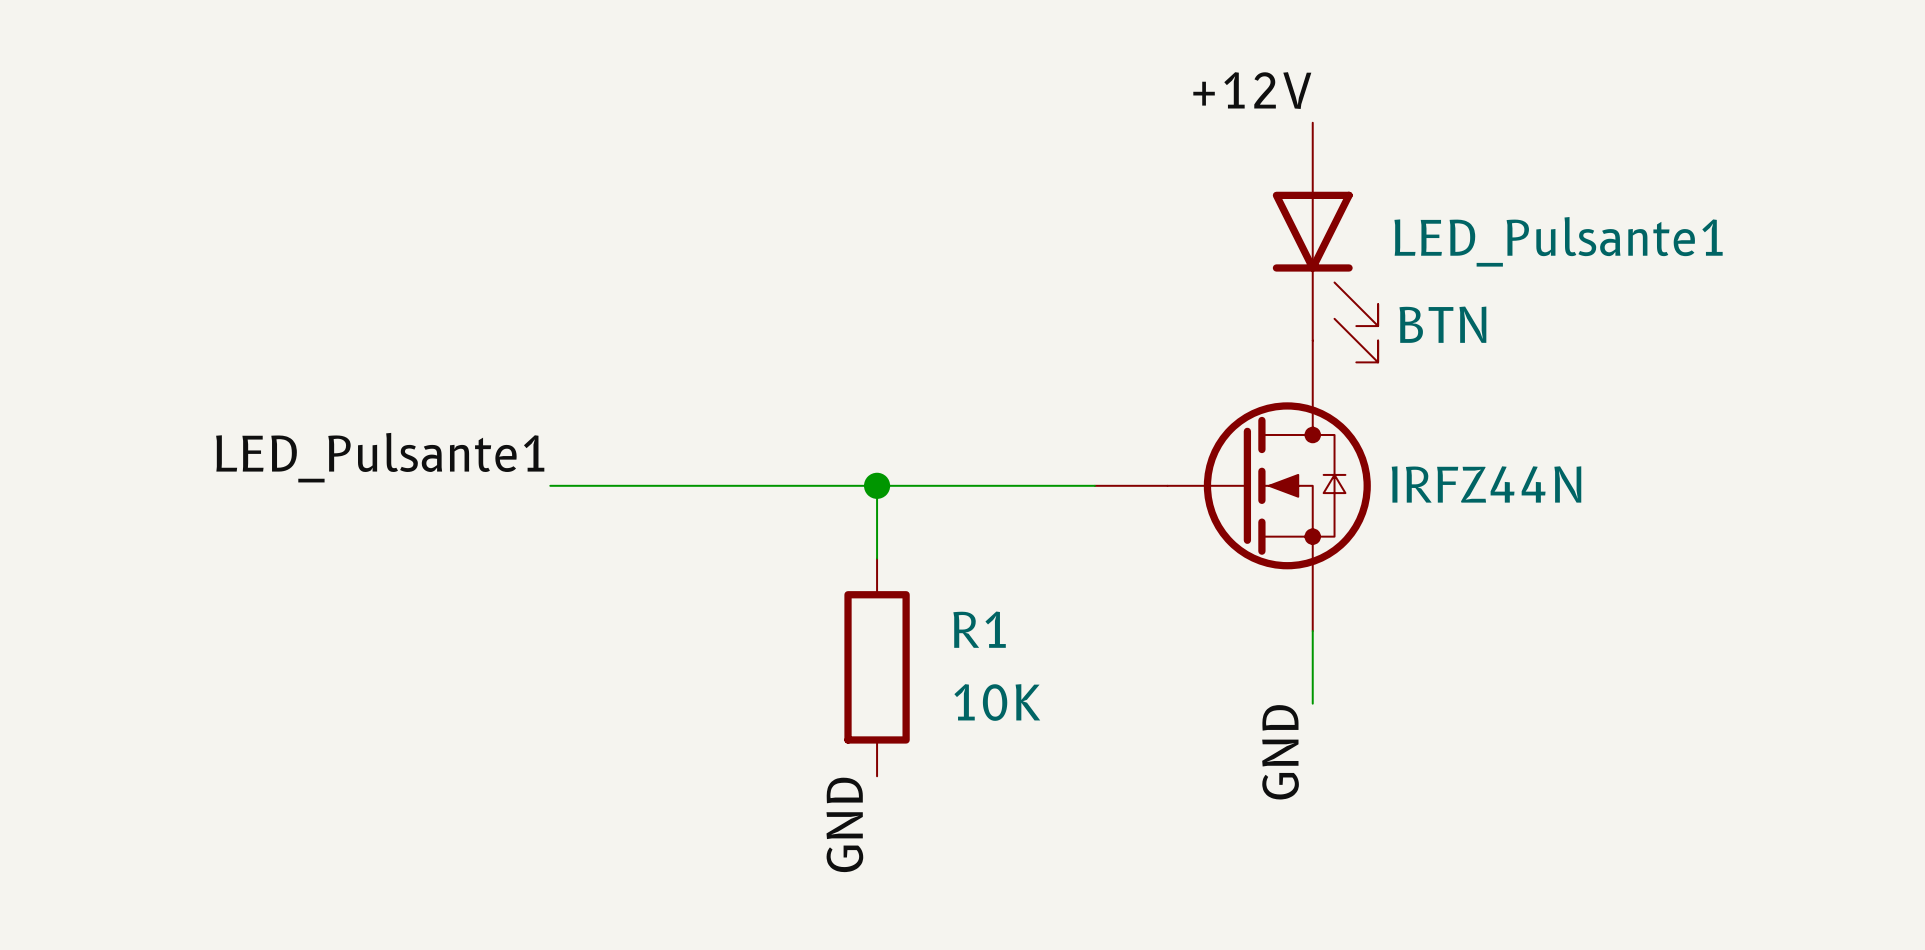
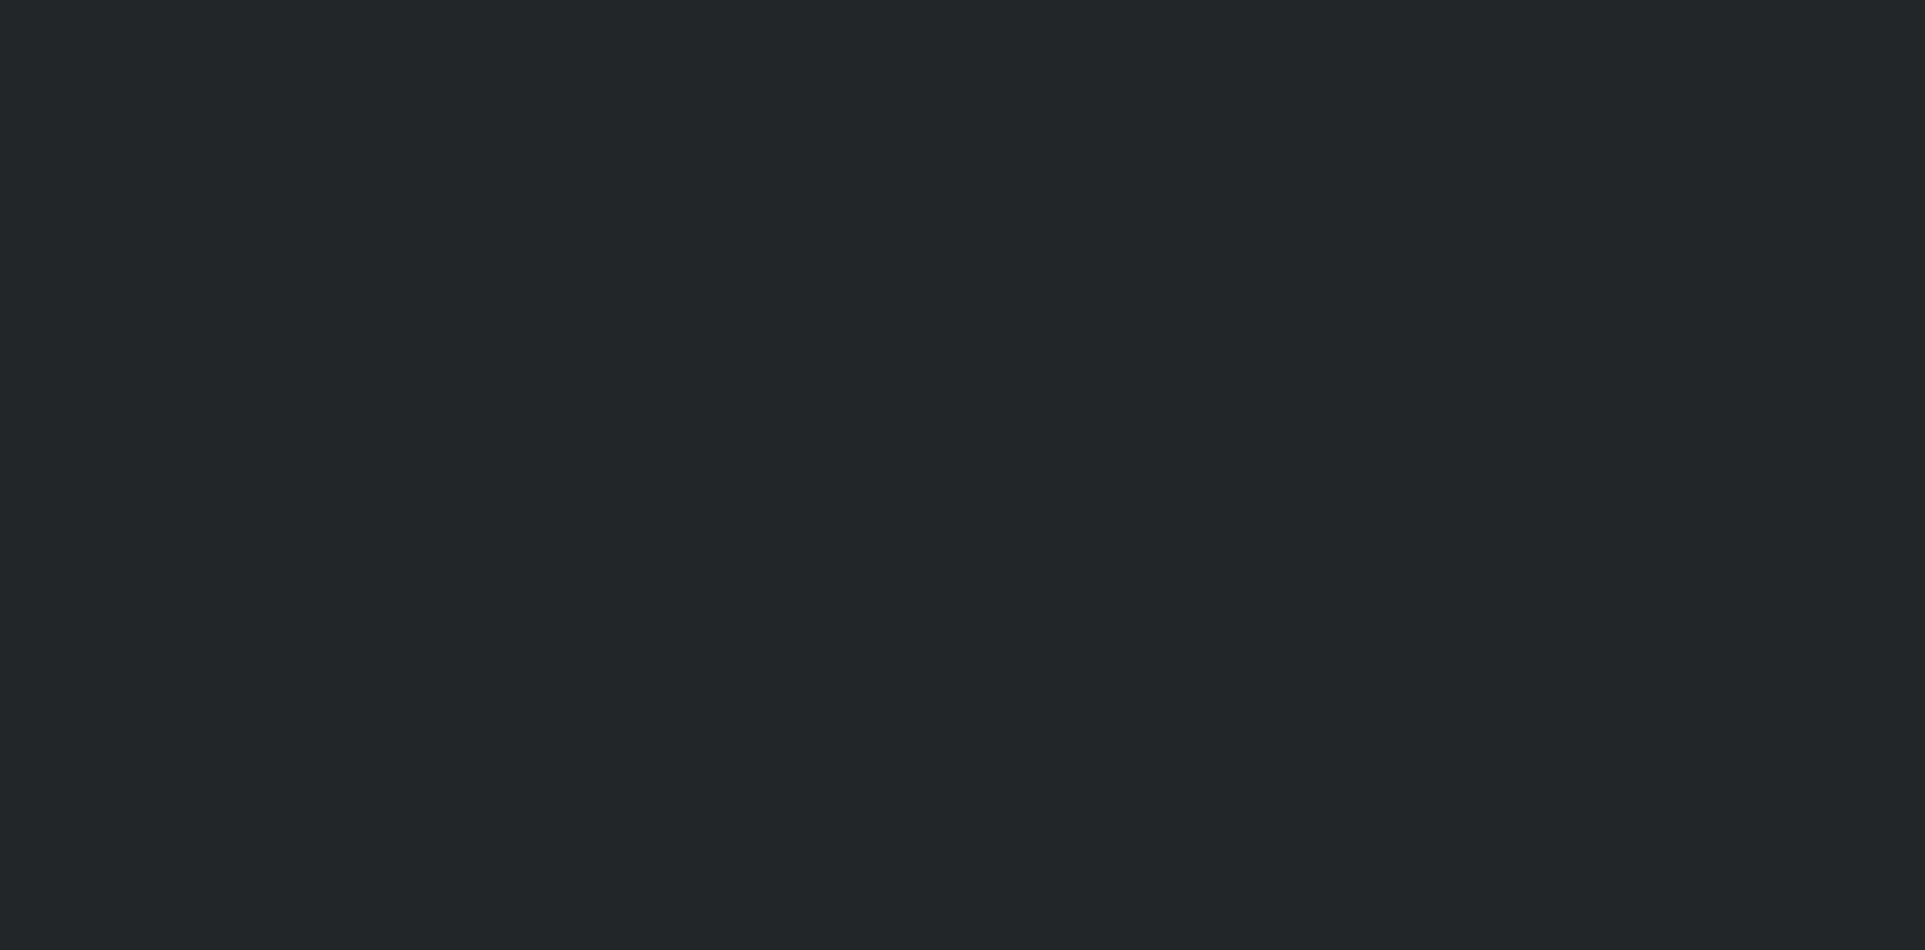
label: +12V (1252, 90) -> none
LED_Pulsante1: BTN (1325, 242) -> none
label: LED_Pulsante1 (380, 457) -> none
wire: (550, 485) (1094, 485) -> none
wire: (877, 485) (877, 558) -> none
junction: (877, 485) -> none
IRFZ44N: (1232, 485) -> none
wire: (1312, 631) (1312, 703) -> none
R1: 10K (877, 667) -> none
label: GND (1280, 752) -> none
label: GND (844, 824) -> none

